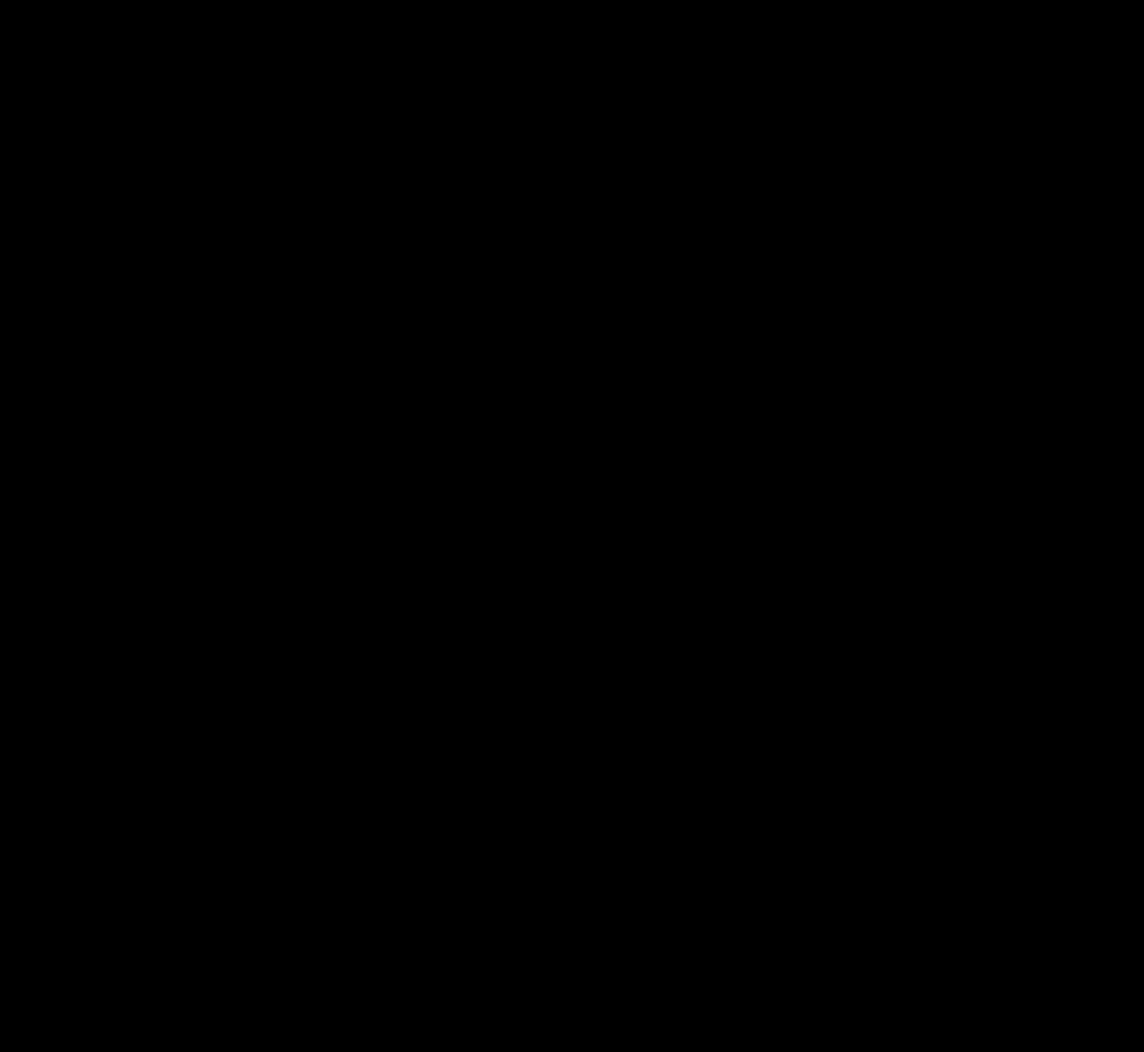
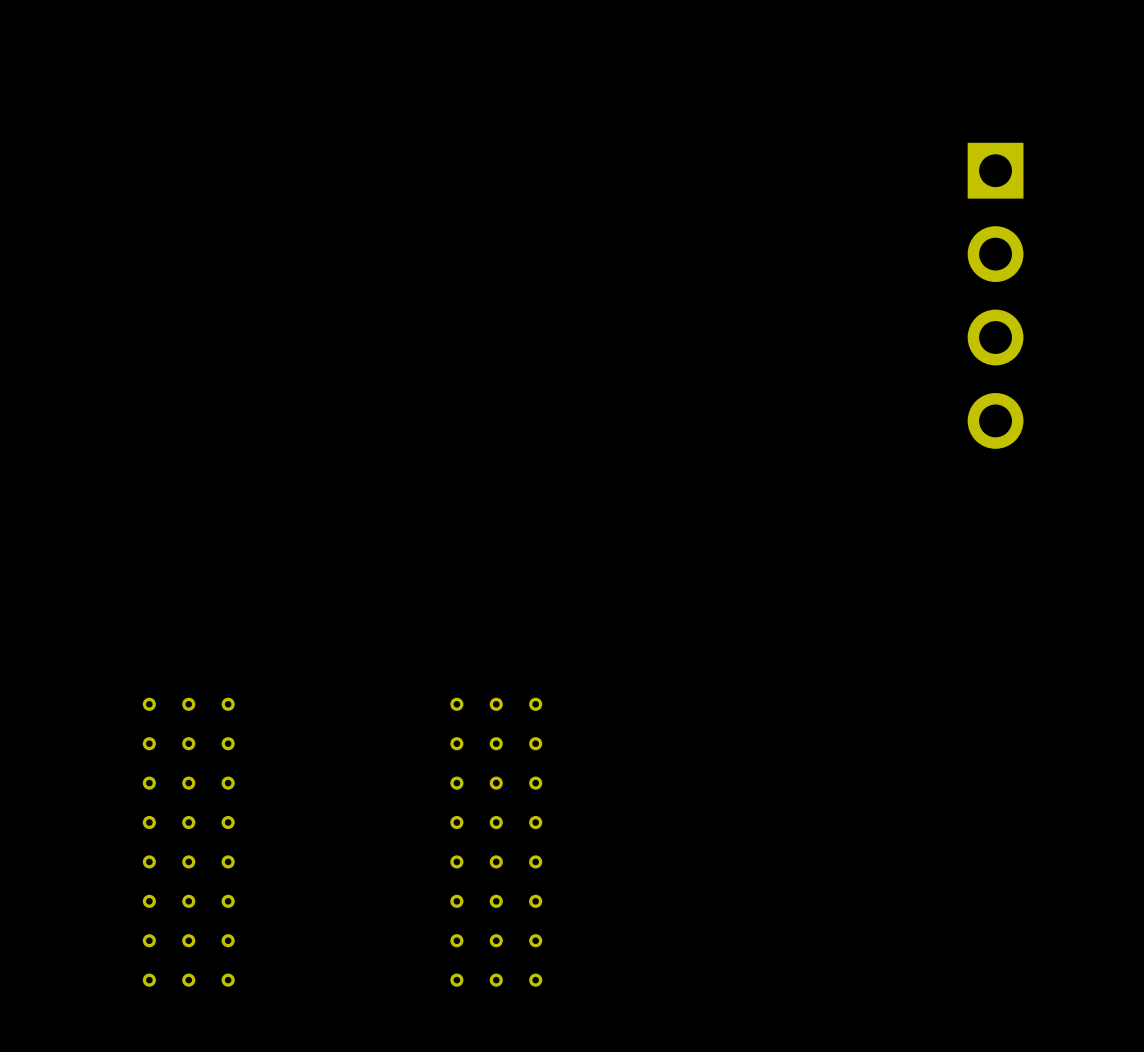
part: none -> (995, 295)
part: none -> (188, 842)
part: none -> (496, 842)

